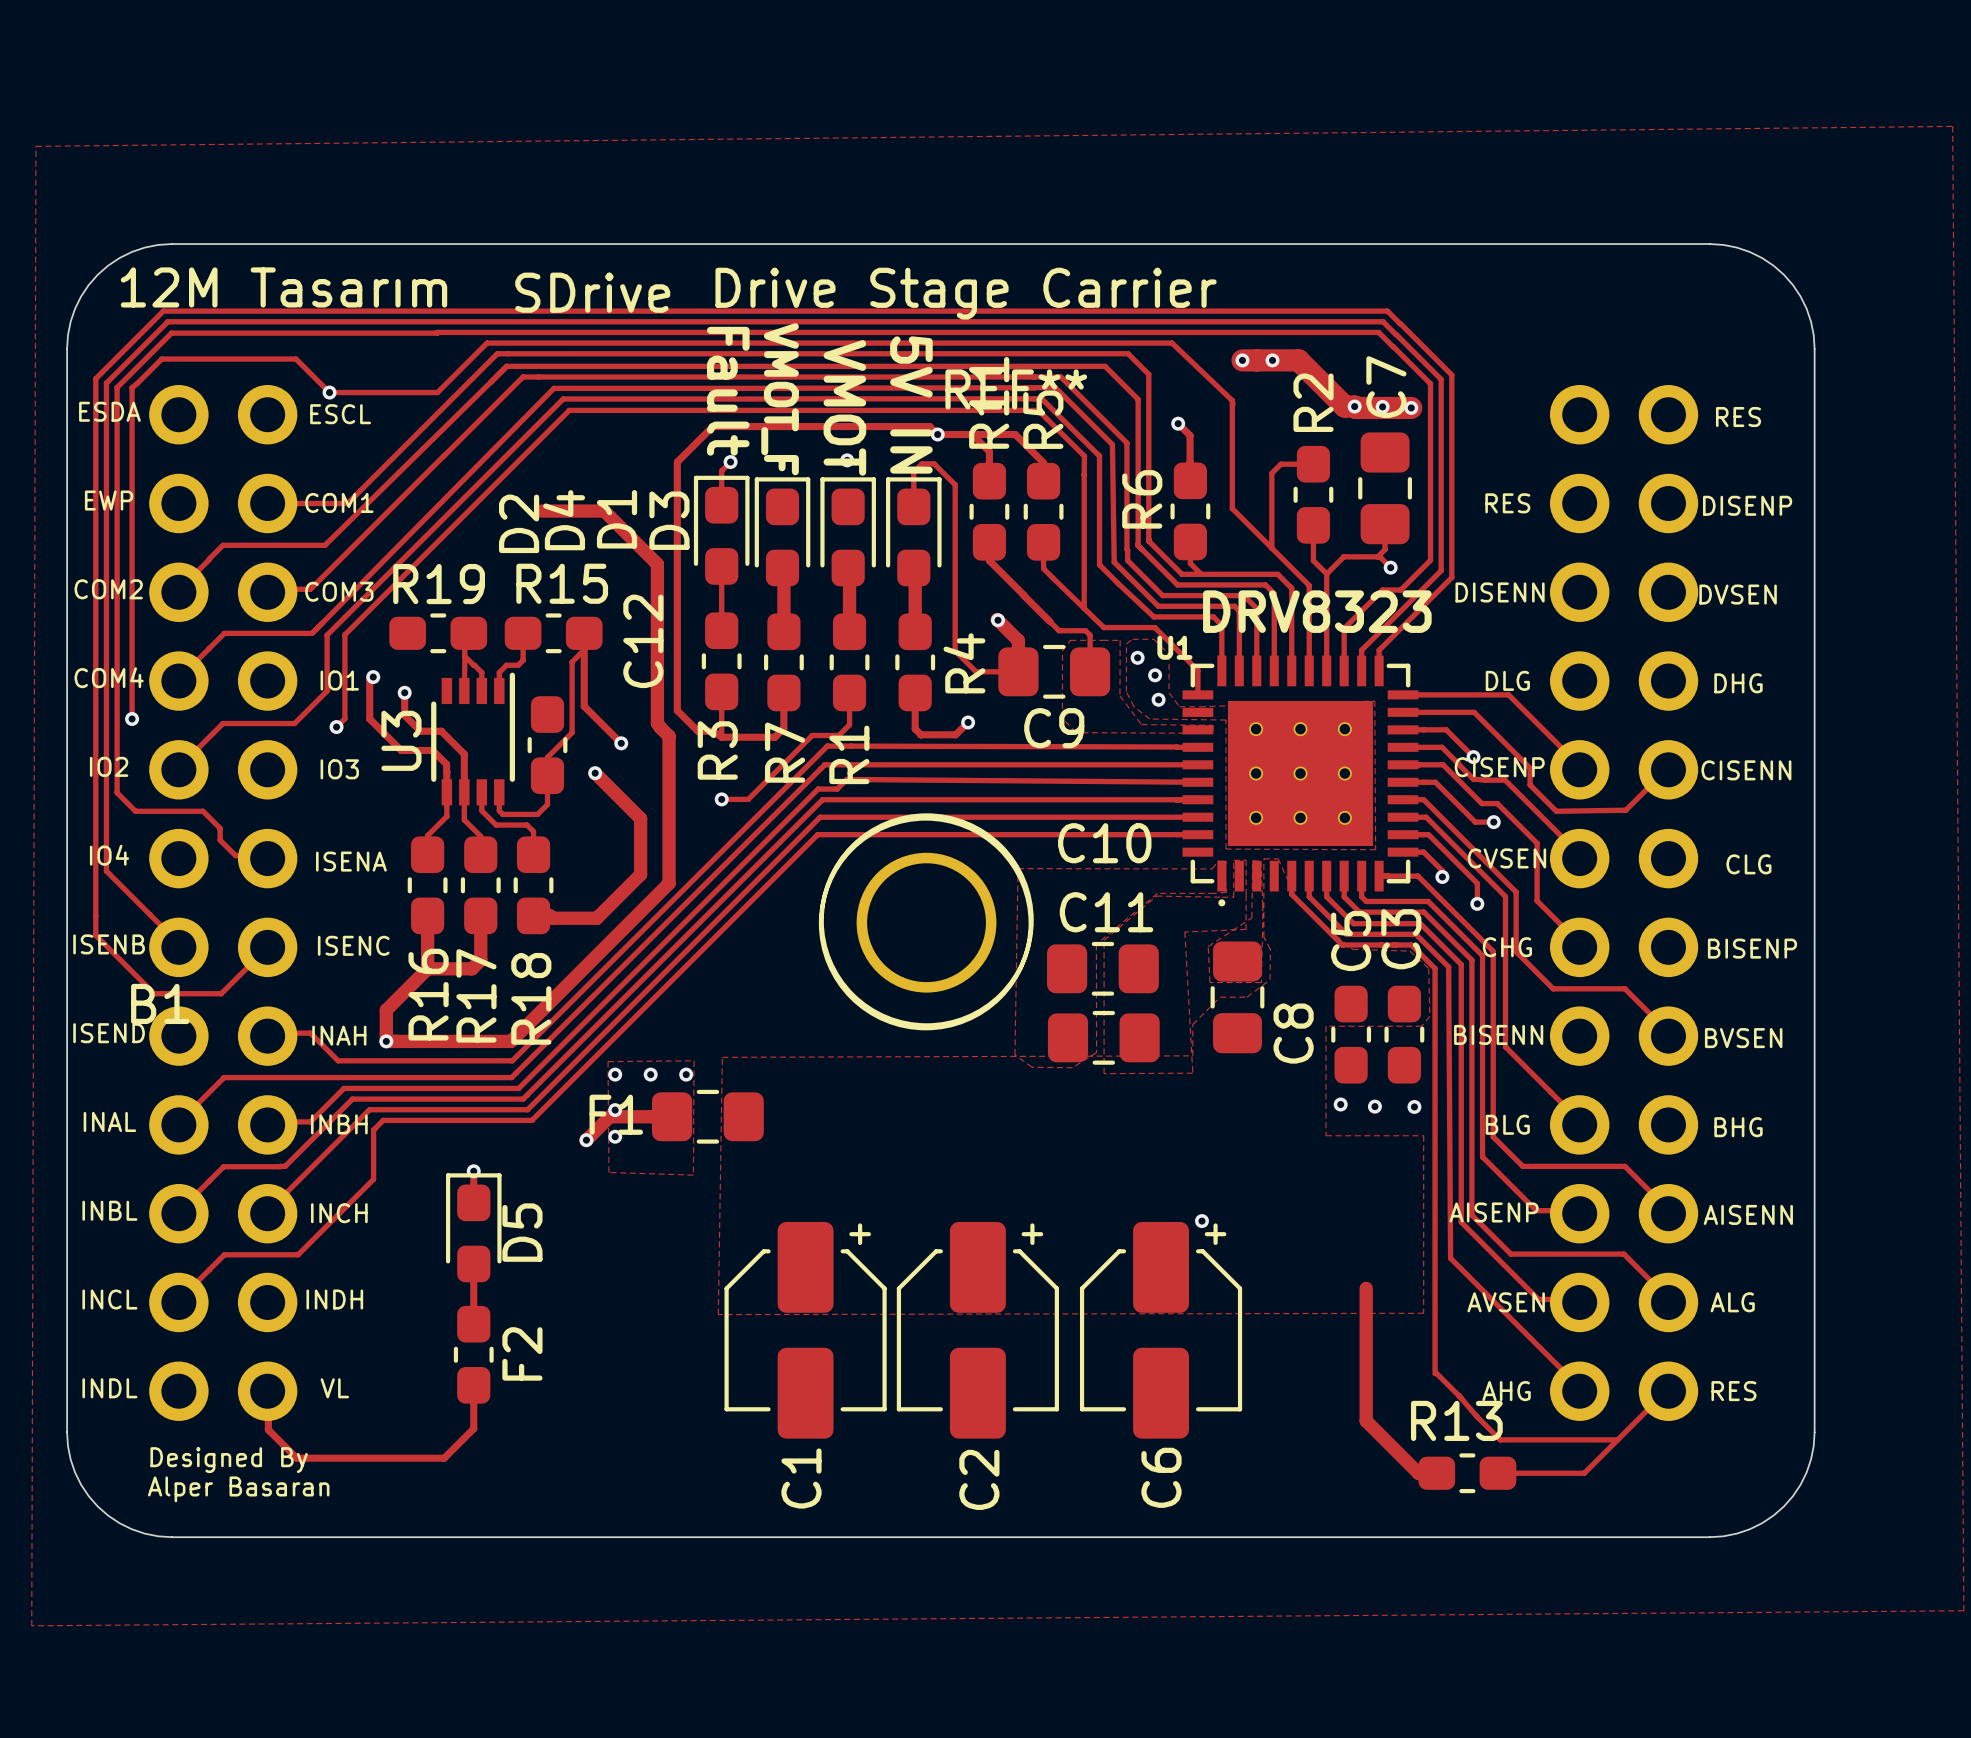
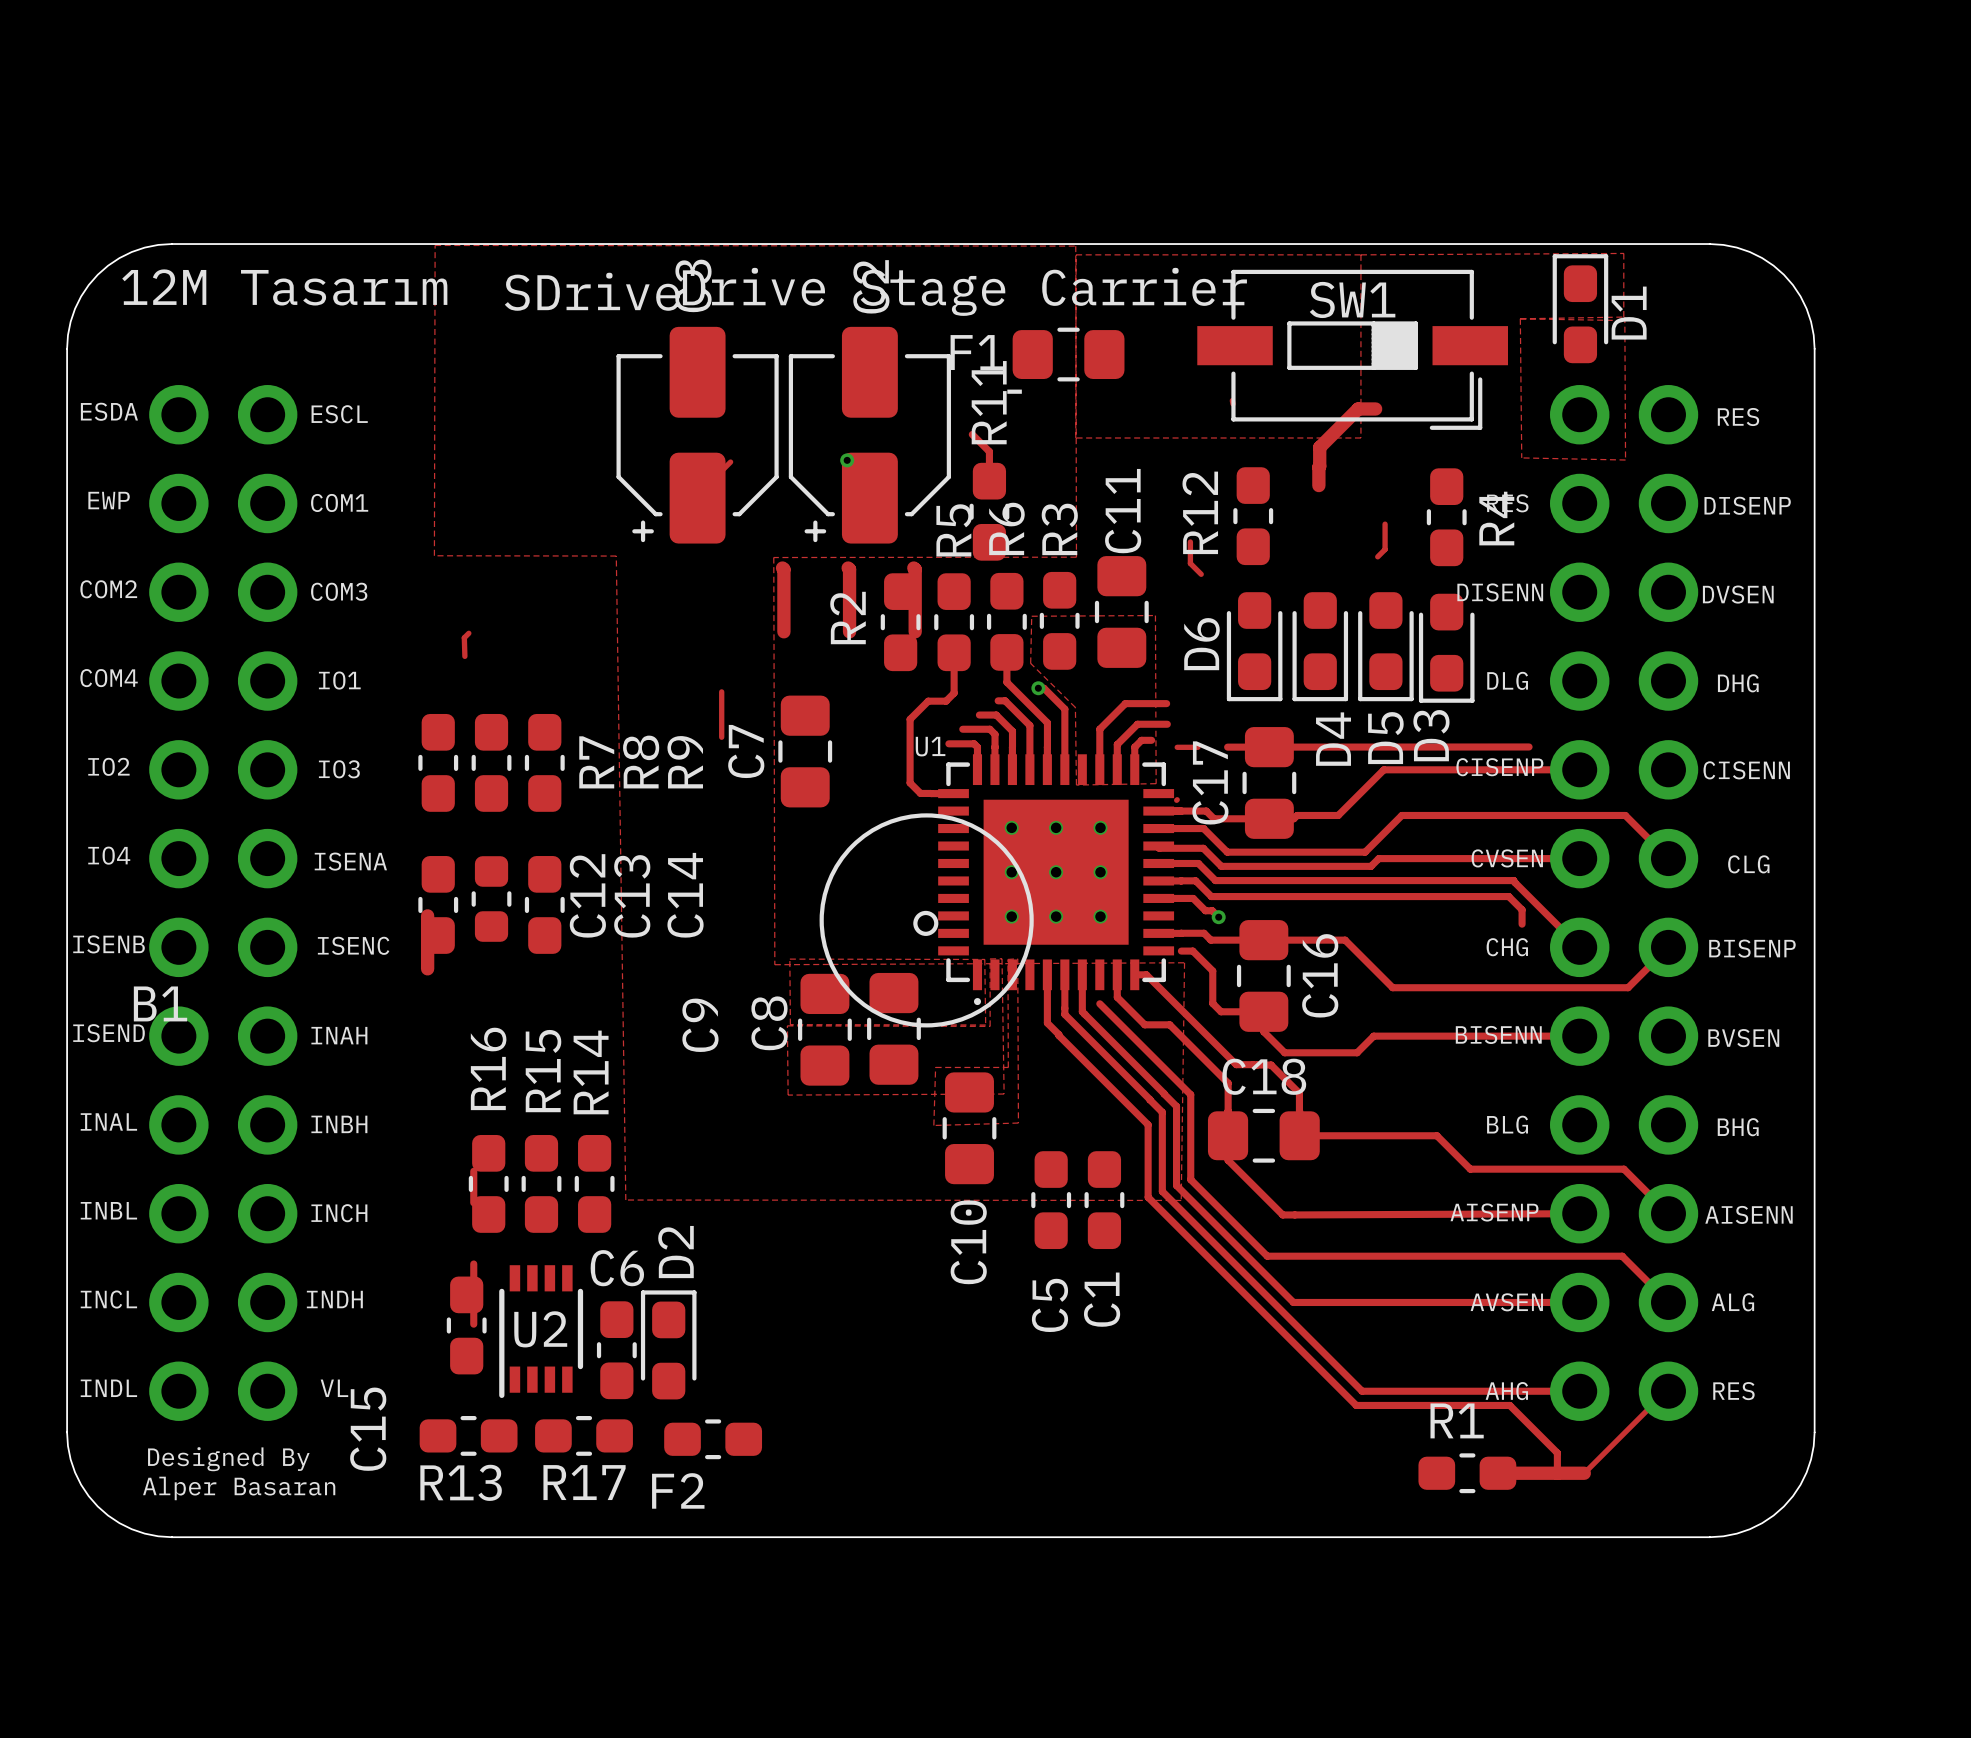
zone outline: (1952, 126) (1963, 1610) (31, 1625) (35, 146) (1952, 126) -> none
zone outline: none -> (435, 245) (434, 555) (616, 556) (625, 1200) (1181, 1200) (1184, 962) (774, 964) (773, 557) (1076, 557) (1075, 246) (435, 245)
zone outline: none -> (1360, 254) (1623, 253) (1623, 320) (1520, 318)
zone outline: none -> (1360, 254) (1076, 254) (1075, 438) (1360, 438) (1360, 254)
zone outline: none -> (1520, 318) (1521, 457) (1625, 460) (1624, 317) (1520, 318)
track: (437, 333) (171, 333) (117, 387) (117, 792) (135, 811) (203, 811) (220, 828) (220, 840) (235, 855) (268, 855) -> none
track: (437, 333) (1378, 332) (1430, 383) (1430, 560) (1400, 590) (1382, 590) (1344, 628) (1344, 670) -> none
track: (1395, 334) (1383, 321) (167, 321) (106, 383) (106, 871) (179, 944) -> none
track: (1396, 334) (1441, 379) (1441, 570) (1361, 650) (1361, 670) -> none
SW1: none -> (1352, 349)
track: (1242, 360) (1298, 360) (1344, 406) (1411, 407) -> none
via: (1242, 360) -> none
via: (1272, 360) -> none
B1 footprint: [149, 385, 1699, 1421] -> [149, 385, 1699, 1421]
track: (1026, 387) (1055, 387) (1112, 444) (1114, 562) (1158, 606) (1234, 606) (1239, 611) (1239, 670) -> none
track: (1035, 387) (553, 388) (312, 633) (224, 633) (179, 678) -> none
C7 name position: C7 (1386, 387) -> C7 (746, 751)
text: Fault (728, 391) -> none
via: (329, 392) -> none
text: VMOT_F (780, 399) -> none
R2 name position: R2 (1313, 402) -> R2 (848, 618)
text: 5V IN (911, 405) -> none
via: (1354, 406) -> none
via: (1382, 406) -> none
text: VMOT (844, 407) -> none
via: (1411, 407) -> none
track: none -> (1375, 408) (1358, 408) (1319, 447) (1318, 485)
track: (1178, 423) (1190, 435) (1190, 462) -> none
via: (1178, 423) -> none
via: (937, 434) -> none
track: (443, 456) (310, 589) (268, 589) -> none
track: (443, 456) (523, 377) (1060, 377) (1126, 443) (1127, 560) (1162, 595) (1243, 595) (1256, 608) (1256, 670) -> none
via: (730, 462) -> none
track: (1313, 464) (1280, 464) (1271, 473) (1271, 548) -> none
track: (1043, 481) (1043, 462) (1015, 434) (937, 434) (929, 426) (712, 426) (677, 462) (677, 710) (697, 731) (713, 731) (721, 737) (774, 737) (783, 728) (783, 692) -> none
C7 position: (1385, 488) -> (805, 751)
R2 position: (1313, 494) -> (900, 622)
R6 name position: R6 (1142, 499) -> R6 (1006, 528)
track: (267, 503) (347, 503) (497, 353) (1128, 353) (1148, 374) (1148, 541) (1182, 574) (1277, 574) (1291, 588) (1291, 670) -> none
track: (913, 506) (913, 472) (921, 463) (934, 463) (955, 484) (955, 650) (976, 671) (1018, 671) (1018, 640) (997, 619) -> none
track: (542, 511) (604, 511) (657, 564) (657, 723) (669, 736) (669, 883) (511, 1041) (386, 1041) (386, 1010) (427, 968) (472, 968) (480, 960) (480, 915) -> none
R5 position: (1043, 511) -> (954, 622)
R6 position: (1190, 511) -> (1006, 621)
R12: none -> (1253, 516)
D1 name position: D1 (617, 519) -> D1 (1629, 313)
D4 name position: D4 (564, 520) -> D4 (1333, 739)
D3 name position: D3 (669, 520) -> D3 (1431, 735)
D2 name position: D2 (519, 523) -> D2 (675, 1252)
track: (1313, 525) (1313, 560) (1326, 573) -> none
D2 position: (721, 530) -> (668, 1344)
D4 rotation: 0° (782, 531) -> 180° (1320, 646)
D4 position: (782, 531) -> (1320, 646)
D1 position: (848, 531) -> (1580, 308)
D3 rotation: 0° (913, 531) -> 180° (1446, 648)
D3 position: (913, 531) -> (1446, 648)
track: (989, 542) (989, 560) (1023, 595) -> none
track: (1043, 542) (1043, 568) (1053, 578) (1103, 627) (1154, 627) (1197, 670) (1197, 694) -> none
track: (1137, 544) (1177, 584) (1265, 584) (1274, 593) (1274, 670) -> none
track: (1138, 545) (1138, 399) (1105, 366) (506, 366) (325, 545) (222, 545) (179, 589) -> none
track: (721, 566) (721, 630) -> none
track: (1390, 567) (1379, 556) (1343, 556) (1326, 573) -> none
via: (1390, 567) -> none
track: (1326, 573) (1326, 670) -> none
track: (1023, 595) (1059, 630) (1085, 630) (1090, 635) (1090, 671) -> none
track: (1084, 608) (1084, 456) (1038, 410) (569, 410) (344, 634) (344, 718) (336, 727) -> none
text: DRV8323 (1317, 611) -> none
zone outline: none -> (1155, 615) (1031, 616) (1030, 663) (1075, 707) (1076, 785) (1156, 783) (1155, 615)
via: (997, 620) -> none
R19: (438, 633) -> none
track: (523, 633) (523, 660) (518, 665) (506, 665) (499, 672) (499, 690) -> none
R15 rotation: 0° (553, 633) -> 90° clockwise (541, 1183)
R15 position: (553, 633) -> (541, 1183)
zone outline: (1132, 639) (1126, 643) (1126, 691) (1133, 706) (1149, 719) (1226, 720) (1226, 849) (1375, 849) (1374, 701) (1179, 706) (1169, 692) (1169, 654) (1154, 639) (1132, 639) -> none
zone outline: (1070, 640) (1062, 650) (1062, 718) (1076, 732) (1213, 733) (1213, 725) (1141, 724) (1119, 695) (1120, 640) (1070, 640) -> none
C12 name position: C12 (643, 641) -> C12 (587, 895)
D6: none -> (1254, 646)
track: none -> (954, 652) (954, 693) (946, 701) (928, 701) (910, 719) (910, 782) (920, 793) (953, 793)
track: none -> (1006, 652) (1006, 682) (1047, 722) (1047, 769)
via: (1137, 657) -> none
R3 position: (721, 661) -> (1059, 620)
R7 position: (783, 662) -> (544, 762)
R1: (849, 662) -> none
R4 position: (915, 662) -> (1446, 517)
track: (1221, 670) (1221, 625) (1213, 616) (1153, 616) (1099, 564) (1099, 456) (1041, 398) (563, 399) (327, 635) (327, 691) (294, 723) (222, 723) (179, 766) -> none
track: (1309, 670) (1309, 585) (1232, 508) (1232, 400) (1172, 343) (487, 343) (437, 392) (329, 392) (296, 359) (161, 359) (132, 387) (132, 719) -> none
track: (1379, 670) (1379, 650) (1451, 577) (1451, 375) (1387, 311) (163, 311) (95, 378) (95, 935) (154, 993) (221, 993) (267, 947) -> none
C9 rotation: 0° (1054, 671) -> 90° clockwise (824, 1029)
C9 position: (1054, 671) -> (824, 1029)
track: (373, 675) (369, 678) (369, 719) (401, 750) (432, 750) (446, 764) (446, 771) -> none
via: (1155, 675) -> none
via: (373, 677) -> none
track: none -> (1038, 688) (1043, 688) (1064, 709) (1064, 769)
via: none -> (1038, 688)
track: (464, 690) (464, 656) (481, 672) (481, 690) -> none
track: (404, 692) (404, 715) (420, 731) (441, 731) (464, 754) (464, 819) (480, 836) (480, 854) -> none
via: (404, 692) -> none
track: (849, 692) (849, 724) (838, 735) (812, 735) (748, 799) (721, 799) -> none
track: (915, 692) (915, 729) (920, 734) (955, 734) (968, 722) -> none
track: (1403, 694) (1508, 694) (1580, 766) -> none
via: (1158, 699) -> none
track: none -> (998, 700) (1005, 700) (1029, 725) (1029, 769)
track: none -> (1166, 703) (1125, 703) (1099, 729) (1099, 769)
track: (1403, 712) (1474, 712) (1530, 768) (1530, 785) (1556, 811) (1625, 810) (1669, 766) -> none
track: none -> (979, 715) (996, 715) (1012, 731) (1012, 769)
via: (132, 719) -> none
via: (968, 722) -> none
track: none -> (1167, 724) (1137, 724) (1117, 744) (1117, 769)
via: (336, 727) -> none
track: none -> (962, 729) (989, 729) (995, 734) (994, 769)
track: (1403, 729) (1446, 729) (1473, 757) -> none
U3: (473, 739) -> none
track: none -> (1151, 740) (1141, 740) (1134, 747) (1134, 769)
track: (621, 743) (584, 706) (584, 633) (584, 649) (572, 662) (572, 732) (547, 757) (547, 804) (537, 814) (502, 814) (499, 810) (499, 792) -> none
via: (621, 743) -> none
track: none -> (948, 743) (974, 743) (977, 747) (977, 769)
C12 position: (547, 745) -> (438, 904)
track: (1176, 747) (827, 746) (512, 1060) (338, 1060) (310, 1033) (268, 1033) -> none
track: none -> (1227, 747) (1529, 746)
track: (1403, 747) (1442, 747) (1458, 763) -> none
R3 name position: R3 (717, 750) -> R3 (1059, 529)
R7 name position: R7 (785, 752) -> R7 (596, 762)
via: (1473, 757) -> none
R9: none -> (438, 762)
R8: none -> (491, 762)
track: (1197, 764) (824, 764) (511, 1077) (224, 1077) (179, 1121) -> none
track: (1403, 764) (1443, 764) (1481, 803) (1497, 803) (1537, 843) (1537, 900) (1580, 944) -> none
track: (1458, 764) (1473, 779) (1505, 780) (1580, 855) -> none
track: none -> (1579, 769) (1383, 769) (1338, 815) (1297, 815) (1293, 818) (1213, 818) (1206, 811) (1158, 811)
track: (446, 772) (446, 816) (427, 835) (427, 854) -> none
track: (595, 773) (640, 818) (640, 874) (596, 918) (552, 918) (550, 915) (533, 915) -> none
via: (595, 773) -> none
U1 position: (1300, 780) -> (1056, 879)
track: (1197, 782) (846, 779) (837, 789) (818, 789) (518, 1088) (343, 1088) (310, 1121) (268, 1121) -> none
C17: none -> (1269, 782)
track: (1403, 782) (1435, 782) (1475, 822) (1493, 822) -> none
track: (481, 792) (481, 810) (496, 825) (527, 825) (533, 831) (533, 854) -> none
via: (721, 799) -> none
track: (1197, 799) (822, 799) (523, 1099) (352, 1099) (285, 1166) (280, 1166) -> none
track: (1403, 799) (1423, 799) (1516, 892) (1516, 951) (1553, 988) (1625, 988) (1669, 1033) -> none
track: (1197, 817) (820, 817) (527, 1109) (369, 1109) (268, 1210) -> none
track: (1403, 817) (1426, 817) (1505, 896) (1505, 1046) (1580, 1121) -> none
via: (1493, 822) -> none
track: none -> (1158, 828) (1203, 828) (1227, 852) (1365, 852) (1401, 815) (1625, 815) (1668, 858)
track: (1197, 834) (817, 834) (532, 1120) (383, 1120) (373, 1130) (373, 1179) (298, 1254) (224, 1254) (179, 1299) -> none
track: (1403, 834) (1428, 834) (1477, 883) (1477, 903) -> none
C10 name position: C10 (1104, 843) -> C10 (968, 1242)
track: none -> (1158, 846) (1159, 848) (1203, 848) (1221, 866) (1371, 866) (1378, 858) (1579, 858)
track: (1403, 852) (1423, 852) (1442, 870) (1442, 877) -> none
zone outline: (1263, 858) (1263, 937) (1270, 949) (1270, 979) (1247, 997) (1220, 997) (1192, 1024) (1192, 1055) (722, 1057) (718, 1314) (1423, 1313) (1423, 1135) (1326, 1135) (1326, 1026) (1421, 1026) (1429, 1016) (1428, 968) (1409, 951) (1352, 949) (1299, 904) (1278, 858) (1263, 858) -> none
zone outline: (1246, 860) (1246, 929) (1184, 931) (1192, 1073) (1104, 1073) (1104, 940) (1156, 896) (1233, 897) (1233, 860) (1246, 860) -> none
zone outline: (1252, 860) (1251, 917) (1208, 946) (1209, 982) (1261, 982) (1262, 905) (1261, 861) (1252, 860) -> none
zone outline: (1218, 861) (1212, 868) (1018, 868) (1014, 1054) (1032, 1067) (1072, 1067) (1096, 1052) (1096, 944) (1157, 893) (1226, 892) (1224, 869) (1226, 861) (1218, 861) -> none
track: none -> (1158, 863) (1198, 863) (1215, 880) (1513, 880) (1579, 947)
track: (1291, 876) (1291, 894) (1342, 944) (1411, 944) (1435, 968) (1435, 1373) -> none
track: (1309, 876) (1309, 896) (1346, 934) (1415, 934) (1448, 967) (1450, 1258) (1580, 1388) -> none
track: (1326, 876) (1326, 896) (1353, 923) (1420, 923) (1461, 964) (1461, 1222) (1538, 1299) (1580, 1299) -> none
track: (1344, 876) (1344, 896) (1359, 912) (1423, 912) (1471, 960) (1471, 1215) (1510, 1254) (1623, 1254) (1669, 1299) -> none
track: (1361, 876) (1361, 896) (1366, 901) (1428, 901) (1482, 955) (1482, 1156) (1536, 1210) (1580, 1210) -> none
track: (1379, 876) (1418, 876) (1493, 951) (1493, 1136) (1522, 1166) (1625, 1166) (1669, 1210) -> none
via: (1442, 876) -> none
track: none -> (1158, 880) (1195, 880) (1211, 896) (1508, 896) (1522, 909) (1522, 924)
R16 position: (427, 885) -> (488, 1183)
R17 rotation: 0° (480, 885) -> 90° clockwise (584, 1435)
R17 position: (480, 885) -> (584, 1435)
R18 position: (533, 885) -> (544, 904)
track: none -> (1158, 898) (1193, 898) (1205, 910) (1212, 910) (1218, 917)
C13: none -> (491, 899)
via: (1477, 903) -> none
via: none -> (1218, 917)
track: none -> (1158, 933) (1204, 933) (1210, 940) (1345, 940) (1392, 987) (1628, 987) (1668, 947)
C5 name position: C5 (1351, 940) -> C5 (1049, 1305)
track: none -> (1181, 951) (1192, 951) (1212, 971) (1212, 1003) (1221, 1011) (1263, 1011) (1263, 1031) (1284, 1052) (1357, 1052) (1373, 1036) (1579, 1036)
zone outline: none -> (1002, 958) (990, 958) (990, 1026) (787, 1025) (788, 1095) (1004, 1094) (1002, 958)
zone outline: none -> (1017, 958) (1018, 1123) (933, 1125) (935, 1067) (1008, 1067) (1007, 959) (1017, 958)
zone outline: none -> (789, 959) (790, 1024) (985, 1025) (984, 959) (789, 959)
C10 rotation: 0° (1102, 968) -> 90° clockwise (969, 1128)
C10 position: (1102, 968) -> (969, 1128)
track: none -> (1047, 974) (1047, 1023) (1148, 1124) (1148, 1197) (1356, 1405) (1509, 1405) (1557, 1452) (1557, 1473)
track: none -> (1064, 974) (1064, 1014) (1149, 1099)
track: none -> (1082, 974) (1082, 1011) (1176, 1106) (1176, 1185) (1293, 1302) (1579, 1302)
track: none -> (1117, 974) (1117, 997) (1144, 1024) (1169, 1024) (1228, 1083) (1228, 1160) (1282, 1214) (1579, 1213)
track: none -> (1134, 974) (1146, 974) (1236, 1064) (1271, 1065) (1299, 1093) (1299, 1111)
C16: none -> (1263, 975)
C3 footprint: [1384, 985, 1425, 1084] -> [616, 326, 779, 544]
R16 name position: R16 (428, 994) -> R16 (488, 1068)
C8 position: (1237, 997) -> (893, 1028)
R18 name: R18 (531, 998) -> C14 (685, 895)
track: none -> (1099, 1003) (1190, 1094) (1190, 1179) (1267, 1256) (1622, 1256) (1668, 1302)
C8 name position: C8 (1293, 1033) -> C8 (769, 1023)
C5 position: (1351, 1034) -> (1051, 1200)
C11 rotation: 0° (1103, 1037) -> 90° clockwise (1121, 611)
C11 position: (1103, 1037) -> (1121, 611)
via: (386, 1041) -> none
zone outline: (694, 1060) (608, 1061) (608, 1172) (693, 1175) (694, 1060) -> none
via: (615, 1074) -> none
via: (650, 1074) -> none
via: (686, 1074) -> none
track: none -> (1149, 1099) (1162, 1112) (1162, 1191) (1362, 1391) (1579, 1391)
via: (1340, 1104) -> none
via: (1374, 1106) -> none
via: (1414, 1106) -> none
via: (615, 1110) -> none
track: none -> (1299, 1111) (1299, 1135) (1436, 1135) (1470, 1169) (1623, 1169) (1668, 1213)
track: (672, 1116) (609, 1116) (586, 1140) -> none
F1 position: (707, 1116) -> (1068, 354)
C18: none -> (1263, 1135)
via: (615, 1136) -> none
via: (586, 1140) -> none
track: (280, 1166) (223, 1166) (179, 1210) -> none
via: (473, 1171) -> none
R14: none -> (594, 1183)
C1 footprint: [724, 1221, 887, 1439] -> [1084, 1151, 1125, 1250]
C6 footprint: [1079, 1221, 1243, 1439] -> [596, 1301, 637, 1400]
via: (1201, 1221) -> none
D5 rotation: 0° (473, 1227) -> 180° (1385, 646)
D5 position: (473, 1227) -> (1385, 646)
D5 name position: D5 (522, 1232) -> D5 (1385, 738)
track: (1366, 1288) (1366, 1420) (1418, 1473) (1436, 1473) -> none
C15: none -> (466, 1325)
C2 rotation: 0° (977, 1330) -> 180° (869, 435)
C2 position: (977, 1330) -> (869, 435)
U2: none -> (541, 1331)
F2 rotation: 0° (473, 1354) -> 90° clockwise (713, 1439)
F2 position: (473, 1354) -> (713, 1439)
track: (1436, 1372) (1461, 1398) -> none
track: (473, 1385) (473, 1428) (444, 1458) (296, 1458) (268, 1429) (268, 1387) -> none
track: (1459, 1396) (1500, 1439) (1617, 1439) -> none
R13 name: R13 (1456, 1420) -> R1 (1457, 1420)
R13: none -> (468, 1435)
track width: thin (1497, 1473) (1584, 1473) -> thick (1497, 1473) (1584, 1473)
C6 name position: C6 (1161, 1477) -> C6 (617, 1268)

